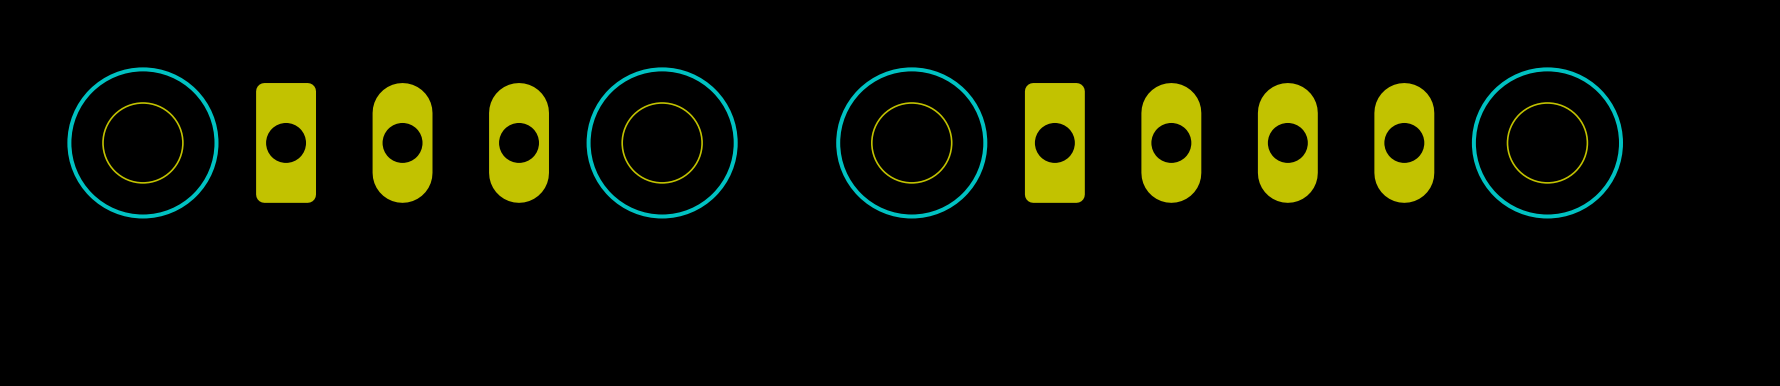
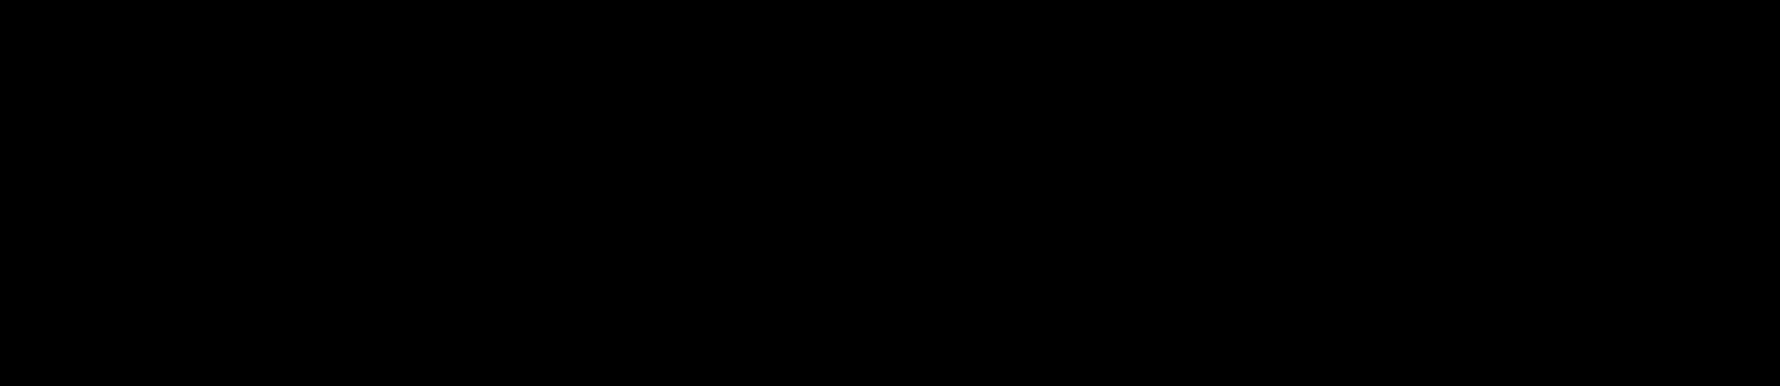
part: (402, 142) -> none
part: (1229, 142) -> none

